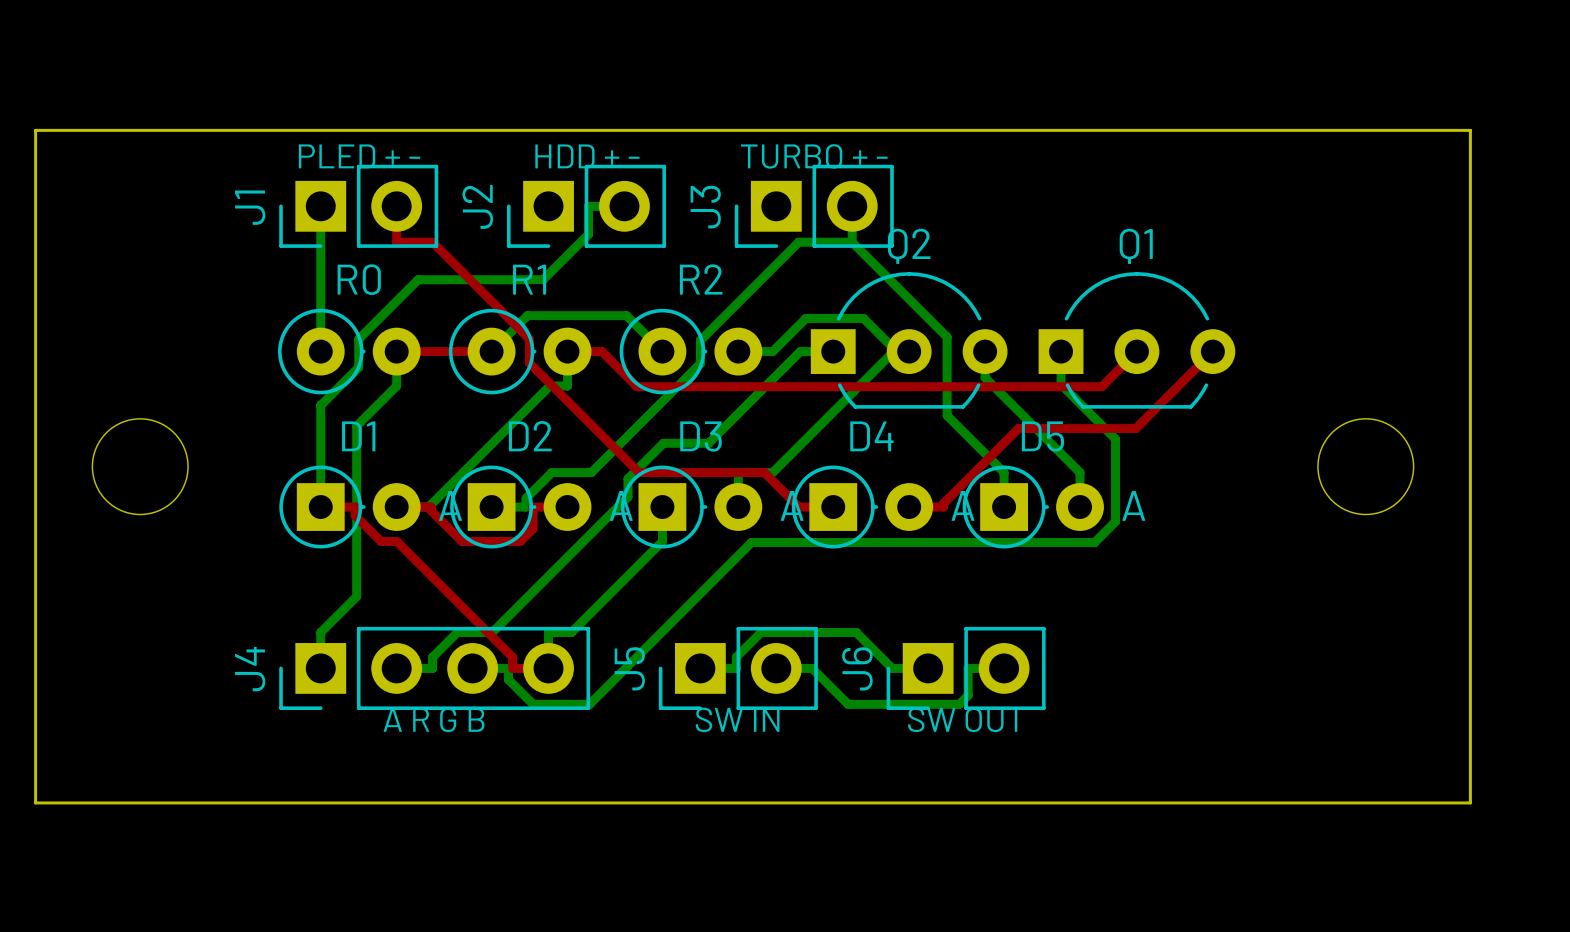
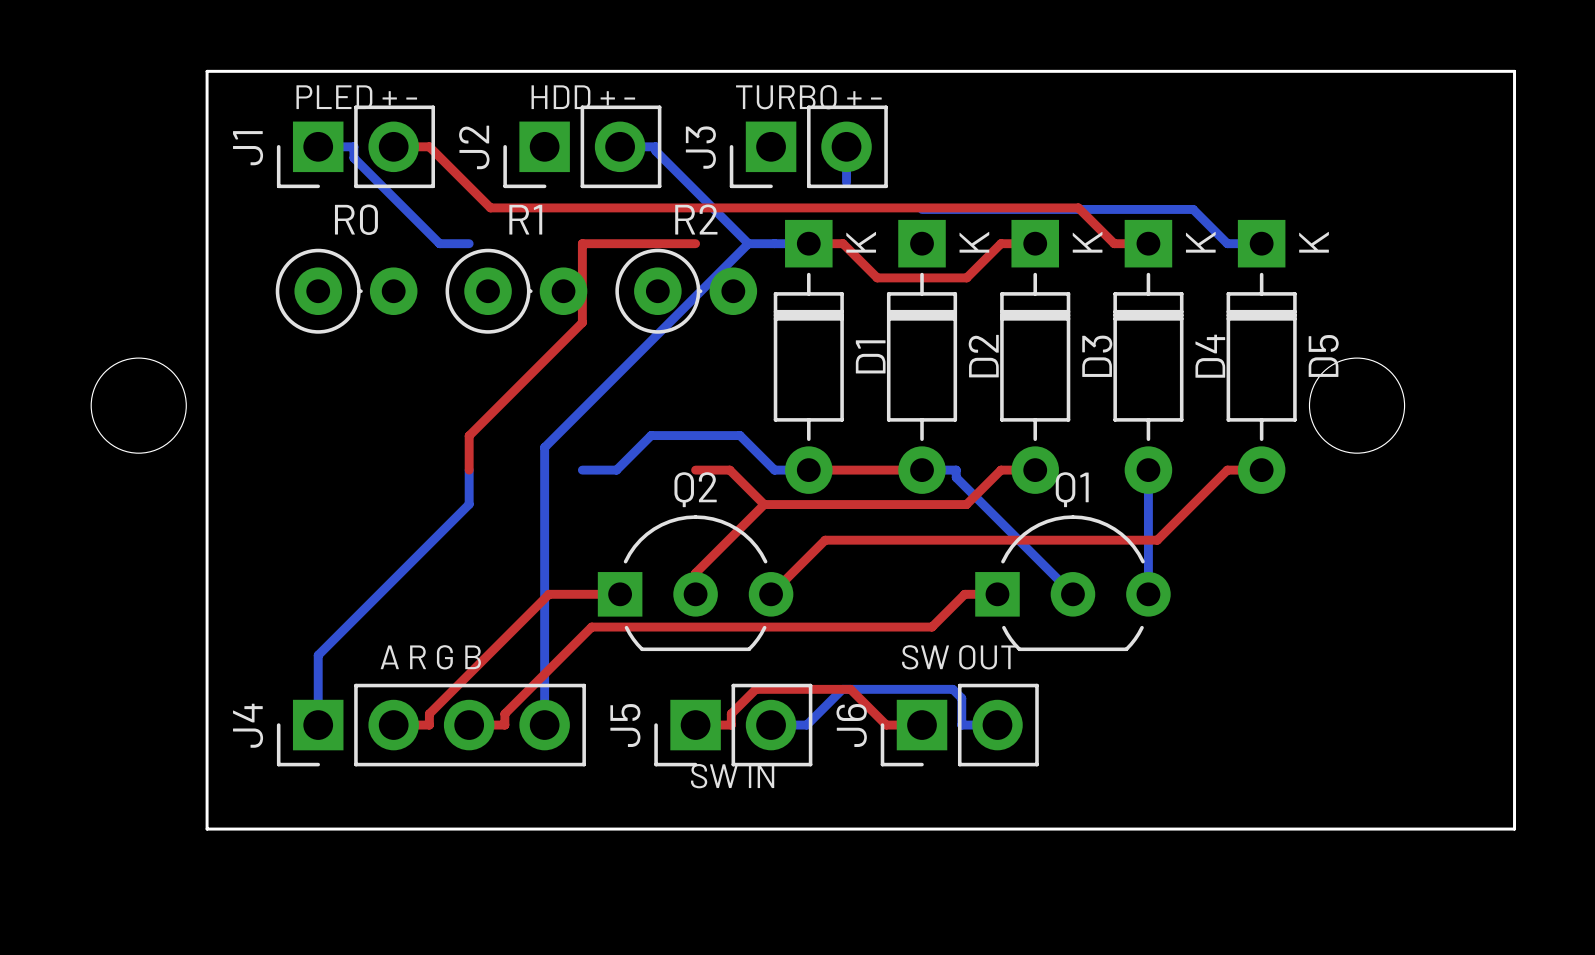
board edge: (208, 130) (35, 130) (35, 802) (1470, 802) (1470, 130) -> (207, 71) (207, 829) (1514, 829) (1514, 71) (1461, 71)
bottom track: (320, 206) (320, 351) -> (318, 146) (353, 146) (353, 157) (439, 243) (469, 243)
top track: (396, 206) (396, 242) (432, 242) (529, 339) (529, 363) (639, 472) (764, 472) (798, 507) (833, 507) -> (393, 146) (429, 146) (490, 207) (1078, 207) (1114, 243) (1148, 243)
bottom track: (624, 206) (588, 206) (588, 234) (543, 279) (418, 279) (358, 339) (358, 367) (320, 405) (320, 507) -> (620, 146) (655, 146) (655, 151) (748, 243)
bottom track: none -> (922, 209) (1193, 209) (1227, 243) (1261, 243)
top track: none -> (695, 243) (582, 243) (582, 322) (469, 435) (469, 470)
bottom track: none -> (748, 243) (808, 243)
top track: none -> (808, 243) (843, 243) (877, 277) (966, 277) (1000, 243) (1035, 243)
Q2 position: (909, 340) -> (695, 583)
Q1 position: (1136, 340) -> (1072, 583)
bottom track: (396, 351) (396, 386) (356, 426) (356, 596) (320, 632) (320, 668) -> none
top track: (396, 351) (491, 351) -> none
bottom track: (491, 351) (527, 315) (626, 315) (662, 351) -> none
bottom track: (567, 351) (567, 386) (549, 386) (431, 504) (431, 507) (396, 507) -> none
top track: (567, 351) (601, 351) (637, 386) (1101, 386) (1136, 351) -> none
bottom track: (738, 351) (772, 351) (805, 318) (863, 318) (892, 347) (892, 352) (772, 472) (738, 472) (738, 507) -> none
bottom track: (833, 351) (800, 351) (708, 443) (663, 443) (627, 478) (627, 496) (492, 632) (457, 632) (432, 657) (432, 668) (396, 668) -> none
bottom track: (985, 351) (985, 377) (1080, 472) (1080, 507) -> none
bottom track: (1061, 351) (1061, 384) (1115, 439) (1115, 521) (1094, 542) (751, 542) (589, 704) (533, 704) (508, 679) (508, 668) (472, 668) -> none
top track: (1212, 351) (1135, 428) (1018, 428) (943, 503) (943, 507) (909, 507) -> none
D1 name position: D1 (358, 436) -> D1 (870, 356)
D2 name position: D2 (530, 436) -> D2 (983, 356)
D3 name position: D3 (701, 436) -> D3 (1097, 356)
D4 name position: D4 (871, 436) -> D4 (1210, 356)
D5 name position: D5 (1042, 436) -> D5 (1323, 355)
D1 footprint: [279, 465, 421, 549] -> [773, 219, 844, 494]
D2 footprint: [450, 465, 592, 549] -> [886, 219, 958, 494]
D3 footprint: [620, 465, 763, 549] -> [1000, 219, 1071, 494]
D4 footprint: [791, 465, 934, 549] -> [1113, 219, 1184, 494]
D5 footprint: [962, 465, 1104, 549] -> [1226, 219, 1297, 494]
top track: (320, 507) (355, 507) (355, 515) (381, 541) (396, 541) (512, 657) (512, 668) (548, 668) -> none
top track: (396, 507) (431, 507) (431, 510) (461, 541) (520, 541) (533, 528) (533, 507) (567, 507) -> none
bottom track: (491, 507) (526, 507) (526, 498) (551, 472) (591, 472) (700, 363) (700, 340) (798, 242) (852, 242) (947, 337) (947, 415) (1004, 472) (1004, 507) -> none
bottom track: (662, 507) (662, 541) (571, 632) (548, 632) -> (748, 243) (544, 447) (544, 570)
bottom track: none -> (469, 470) (469, 504) (318, 655) (318, 725)
bottom track: none -> (582, 470) (616, 470) (651, 435) (740, 435) (774, 470) (808, 470)
top track: none -> (695, 470) (729, 470) (764, 504)
top track: none -> (808, 470) (922, 470)
bottom track: none -> (922, 470) (956, 470) (956, 477) (1072, 594)
top track: none -> (1035, 470) (1000, 470) (966, 504) (764, 504)
bottom track: none -> (1148, 470) (1148, 594)
top track: none -> (1261, 470) (1227, 470) (1157, 540) (825, 540) (771, 594)
top track: none -> (764, 504) (695, 573) (695, 594)
top track: none -> (620, 594) (548, 594) (429, 713) (429, 725) (393, 725)
top track: none -> (997, 594) (964, 594) (932, 627) (591, 627) (504, 713) (504, 725) (469, 725)
J4 position: (434, 668) -> (431, 725)
bottom track: none -> (544, 606) (544, 725)
bottom track: (700, 668) (736, 668) (736, 657) (761, 632) (856, 632) (892, 668) (928, 668) -> none
J5 position: (738, 668) -> (733, 725)
bottom track: (776, 668) (812, 668) (848, 704) (959, 704) (968, 695) (968, 668) (1004, 668) -> none
J6 position: (966, 668) -> (959, 725)
text position: SW IN (737, 719) -> SW IN (732, 776)
top track: none -> (695, 725) (731, 725) (731, 713) (755, 689) (850, 689) (886, 725) (922, 725)
bottom track: none -> (771, 725) (806, 725) (842, 689) (952, 689) (961, 698) (961, 725) (997, 725)

